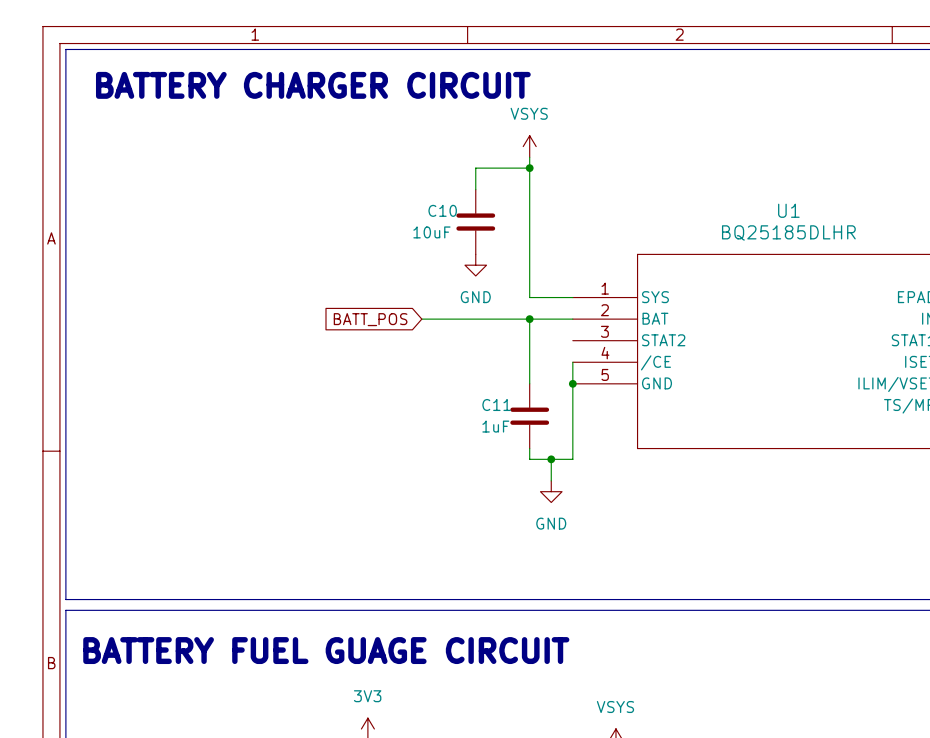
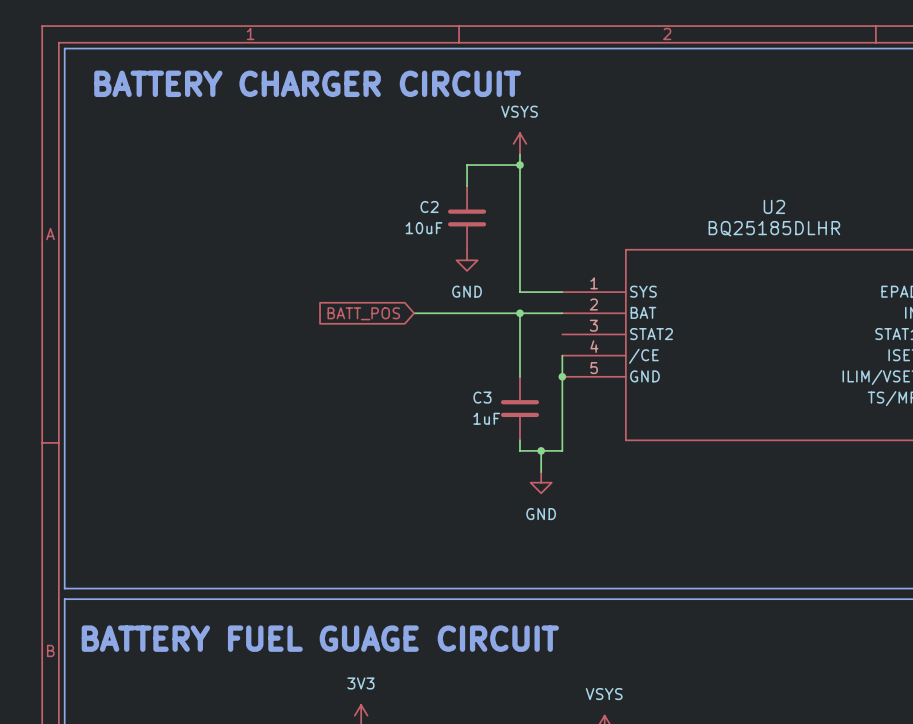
C10 name: C10 (442, 210) -> C2 (429, 206)
U1 name: U1 (788, 210) -> U2 (774, 206)
C11 name: C11 (496, 405) -> C3 (482, 397)

